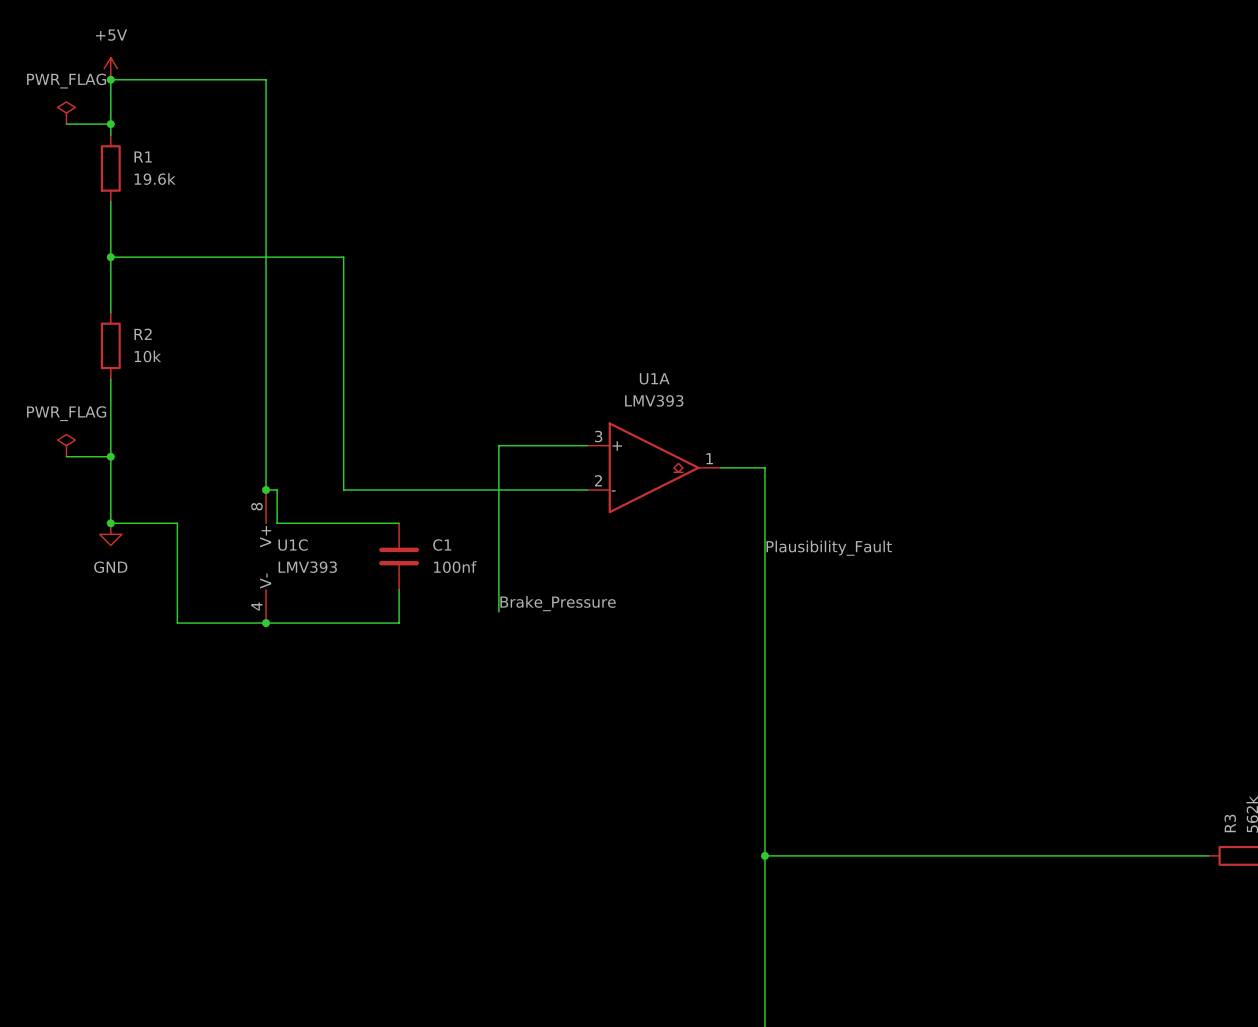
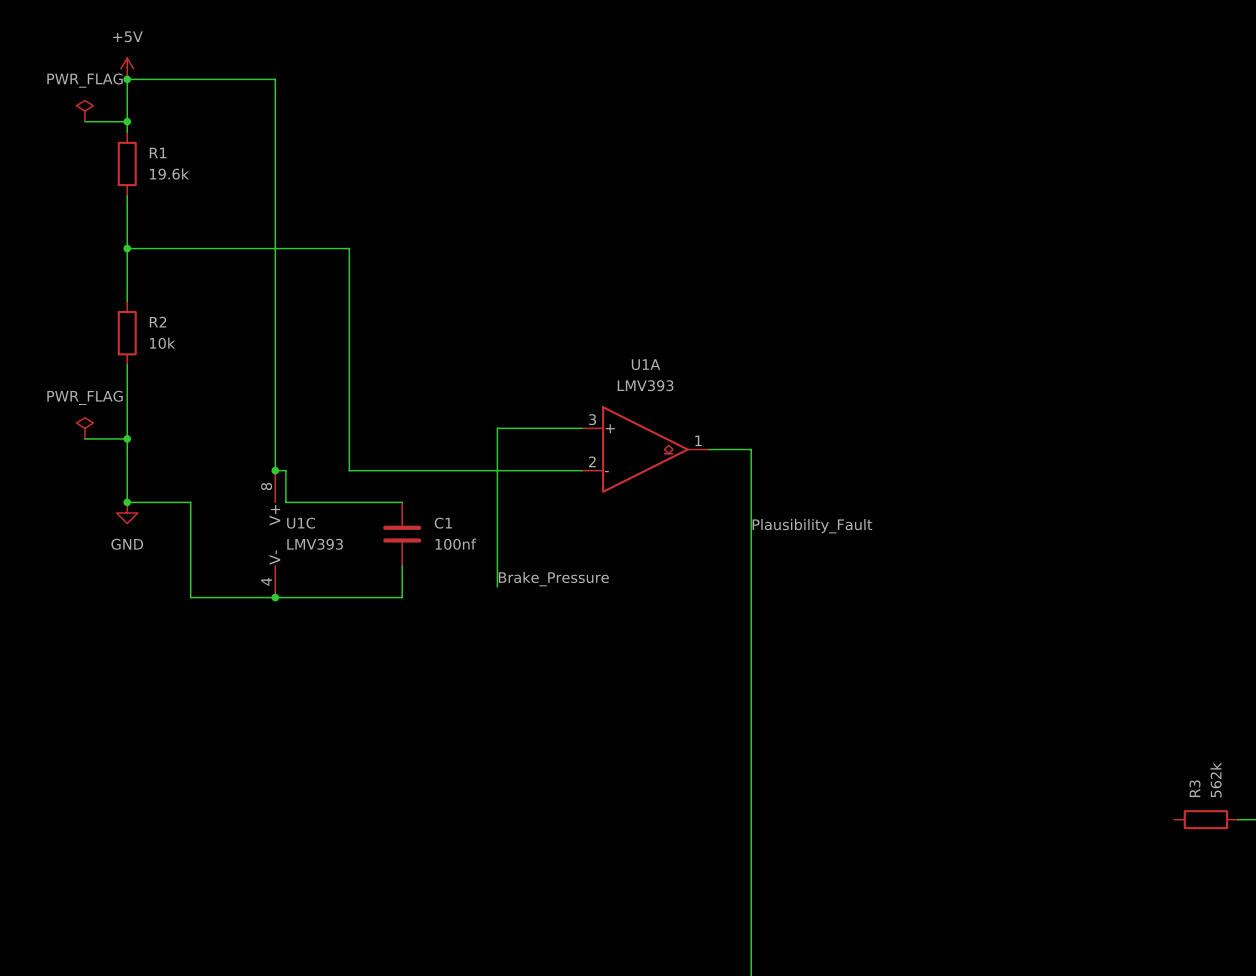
wire: (764, 855) (1208, 855) -> none
junction: (764, 855) -> none

